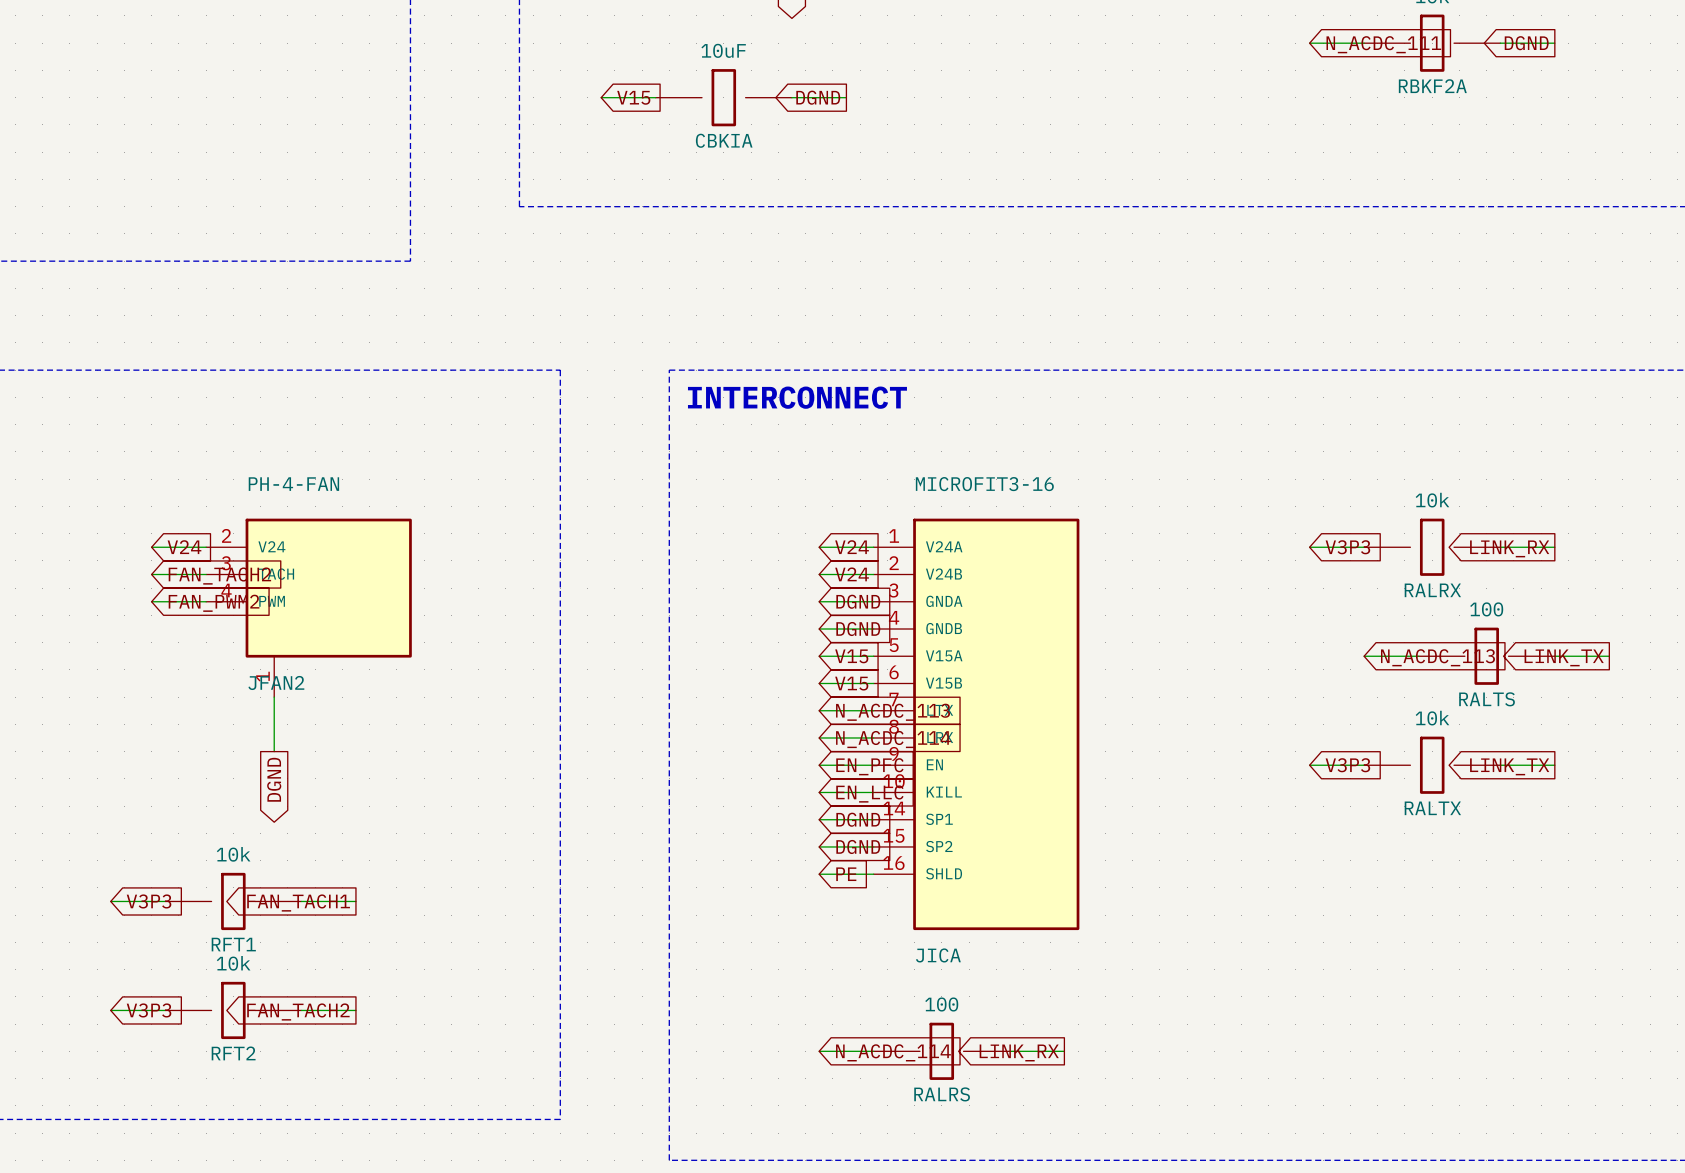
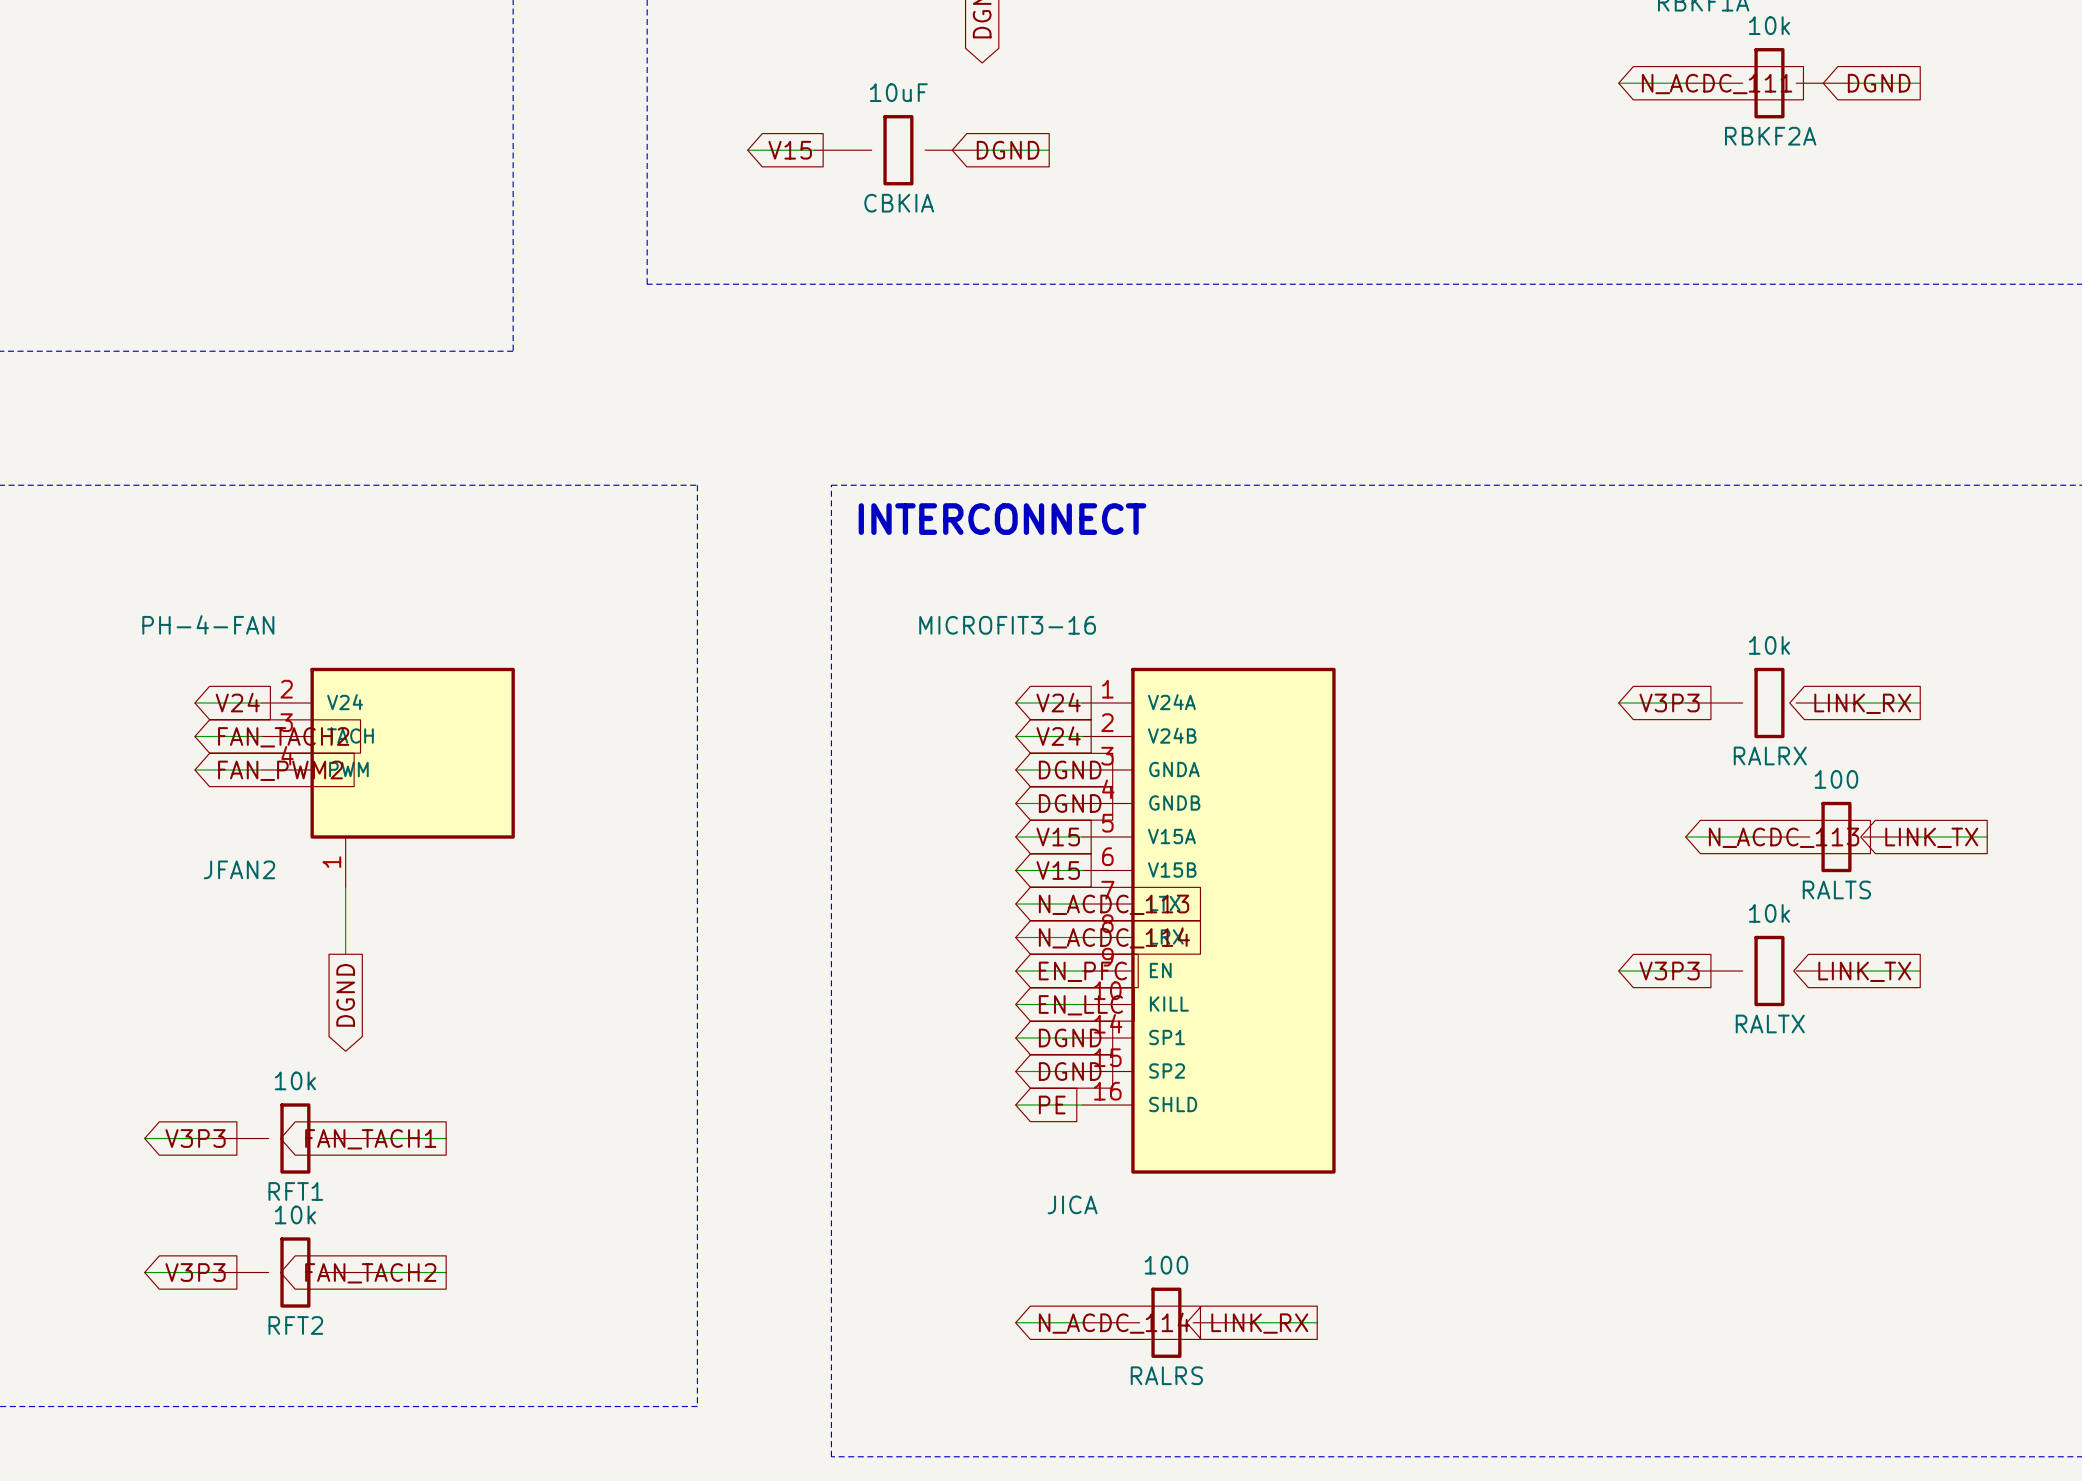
JFAN2 value position: PH-4-FAN (293, 484) -> PH-4-FAN (208, 624)
JICA value position: MICROFIT3-16 (984, 484) -> MICROFIT3-16 (1007, 625)
JFAN2 name position: JFAN2 (276, 682) -> JFAN2 (239, 869)
JICA name position: JICA (938, 955) -> JICA (1072, 1204)

